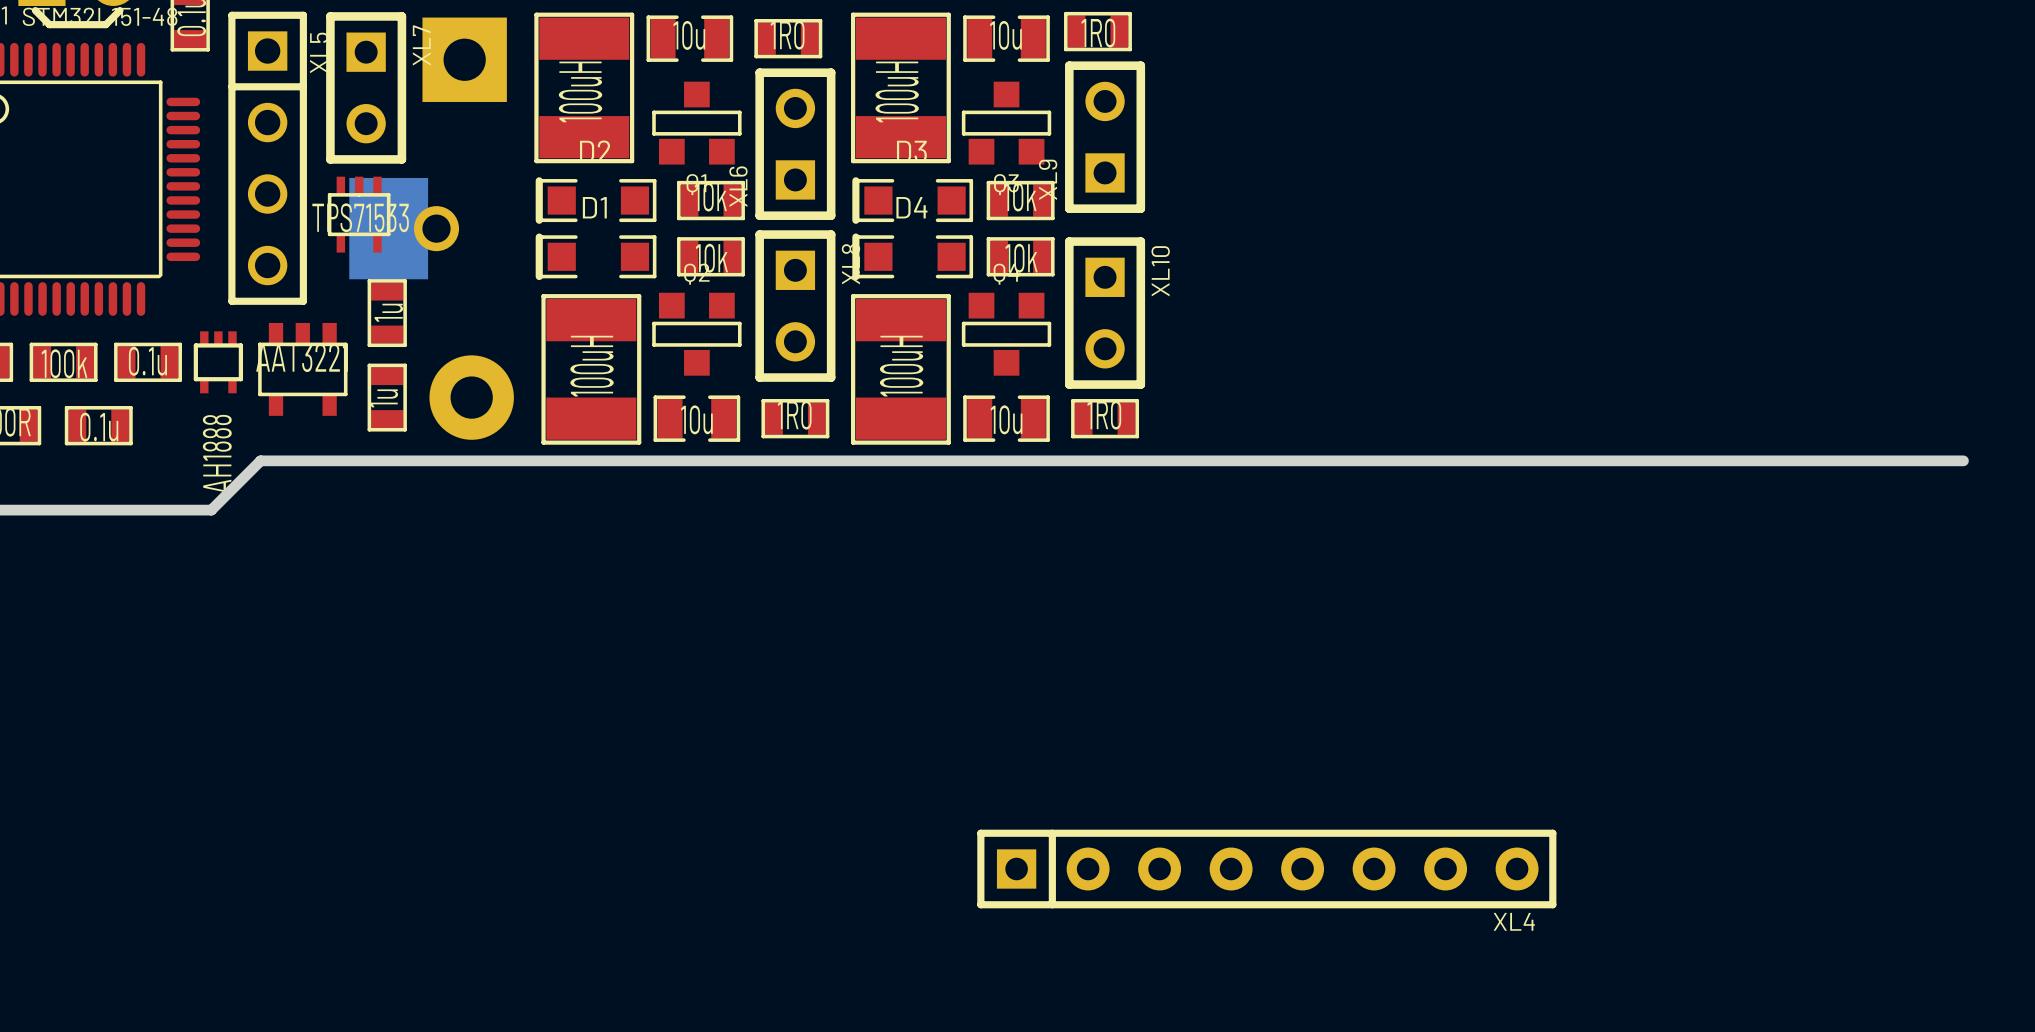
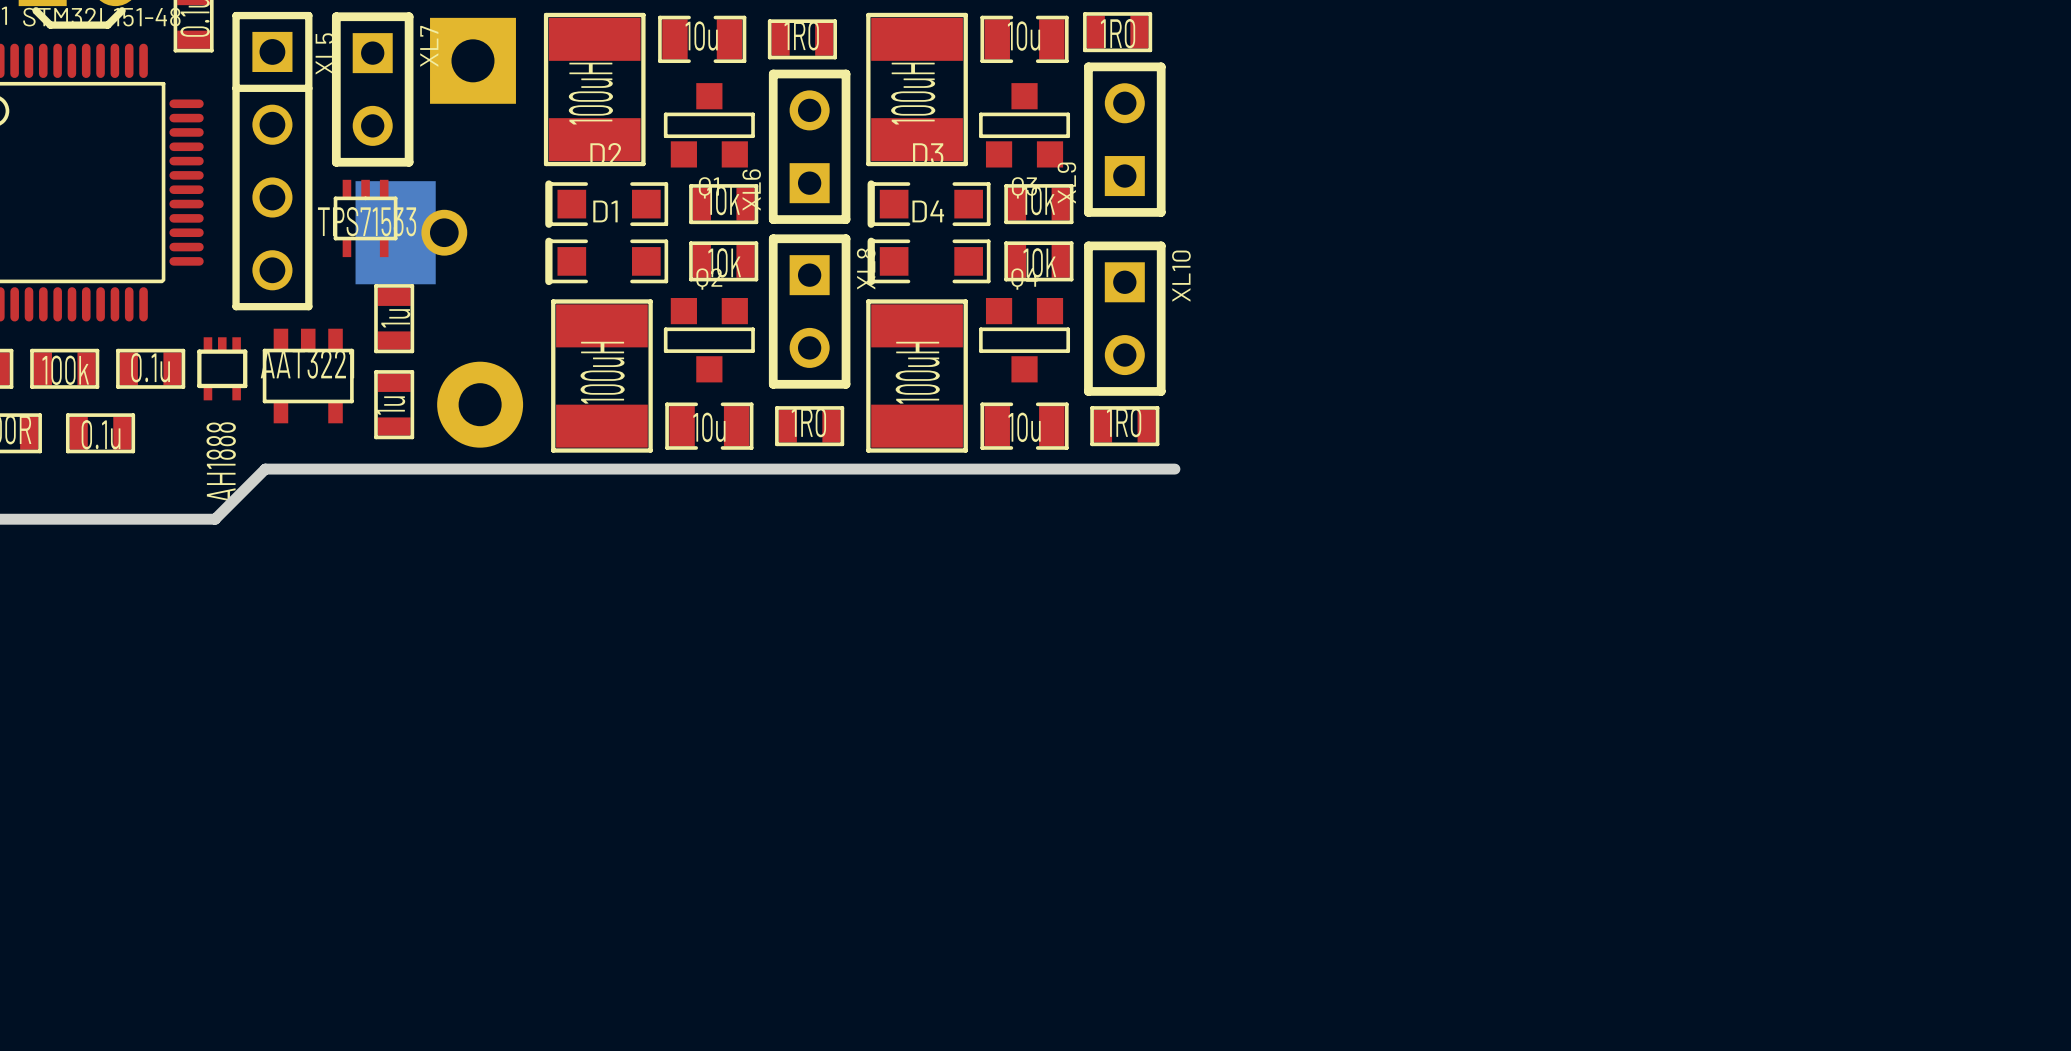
board edge: (1154, 460) (1963, 460) -> none
XL4: (1266, 869) -> none

